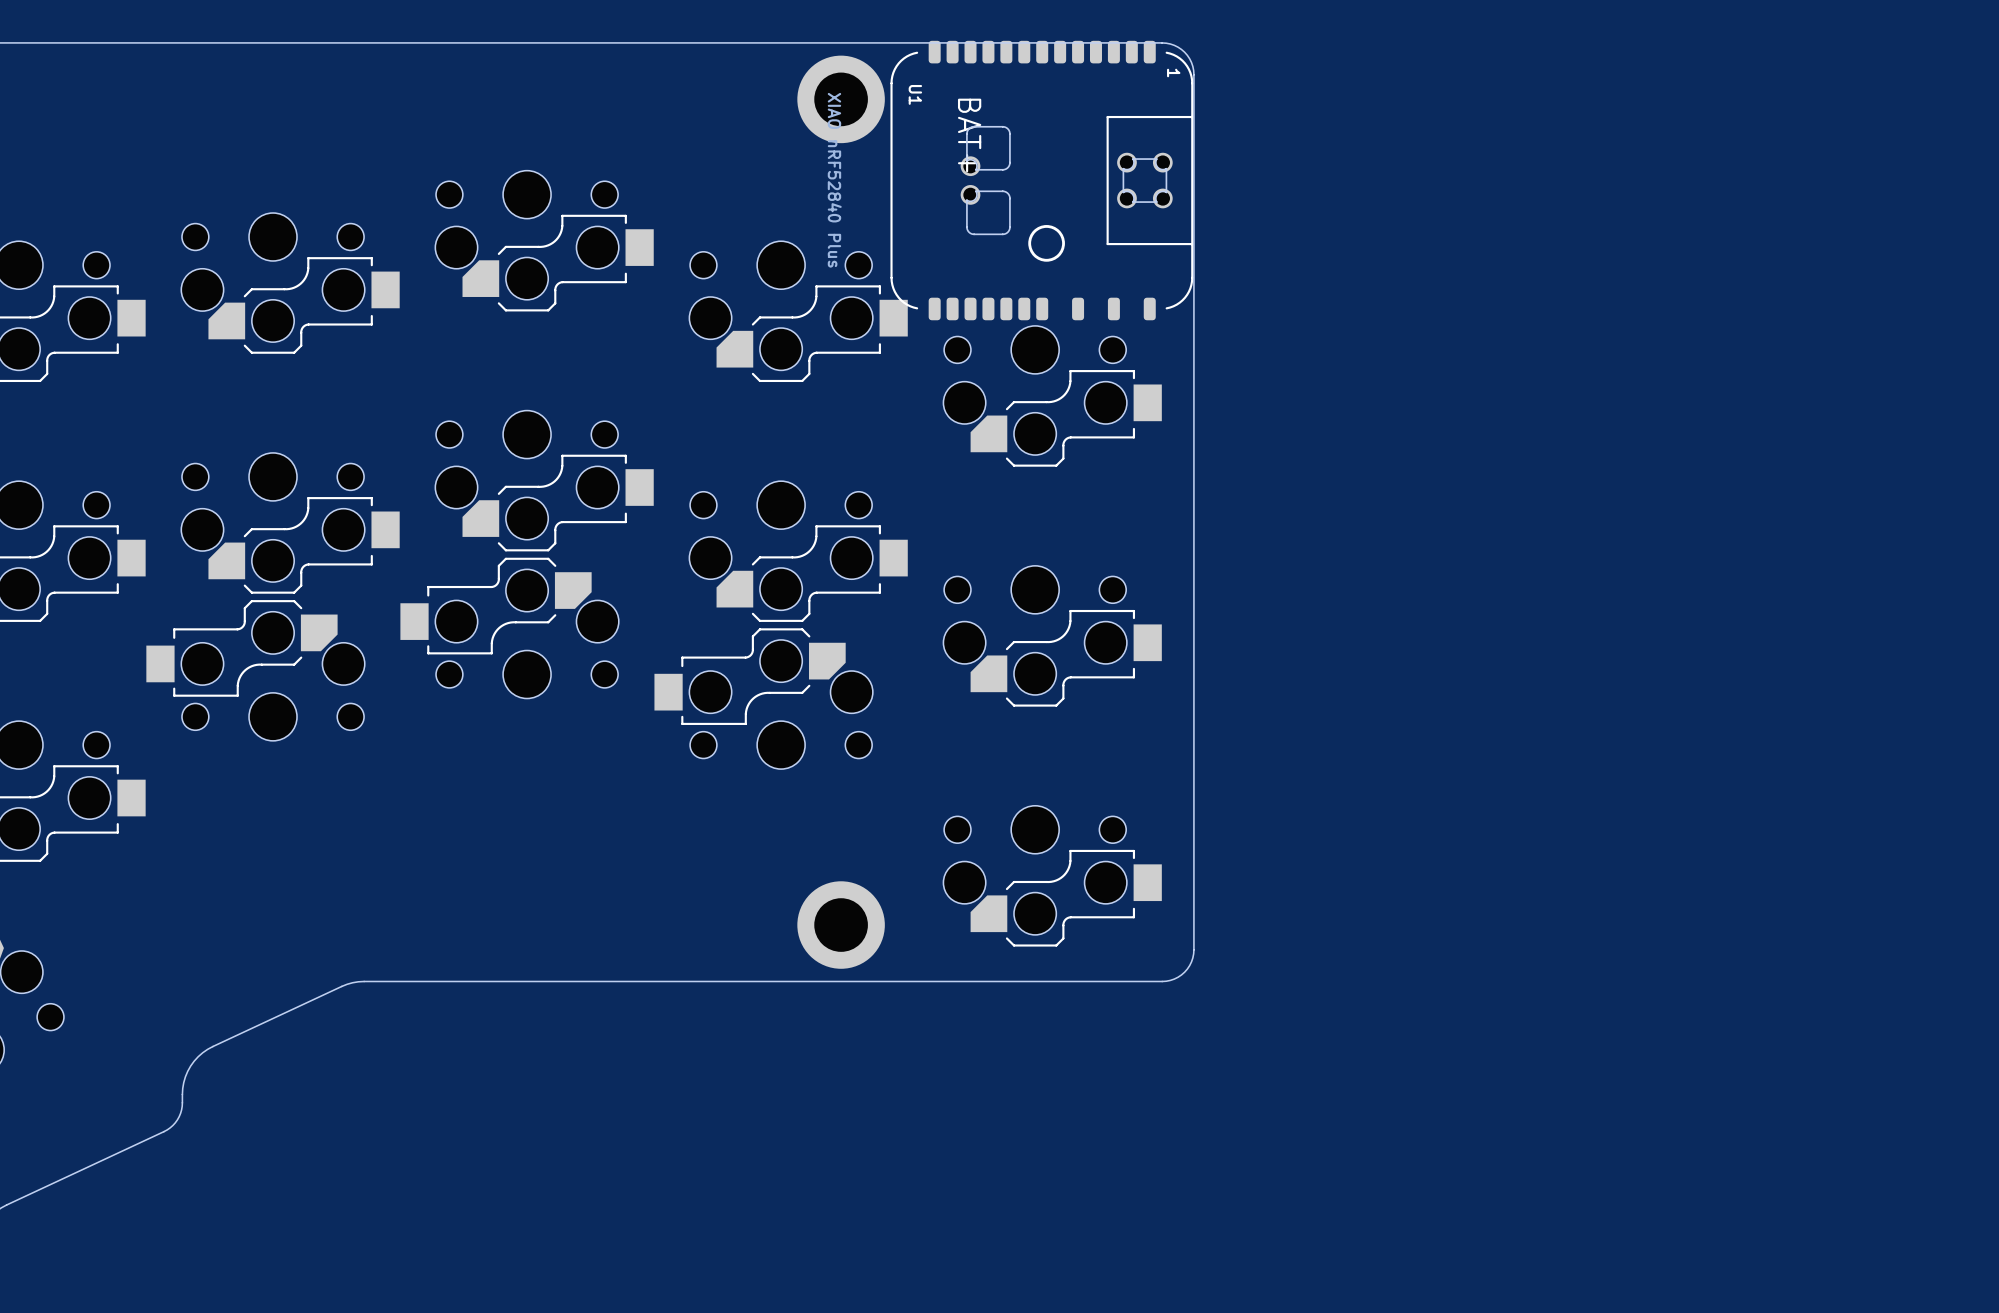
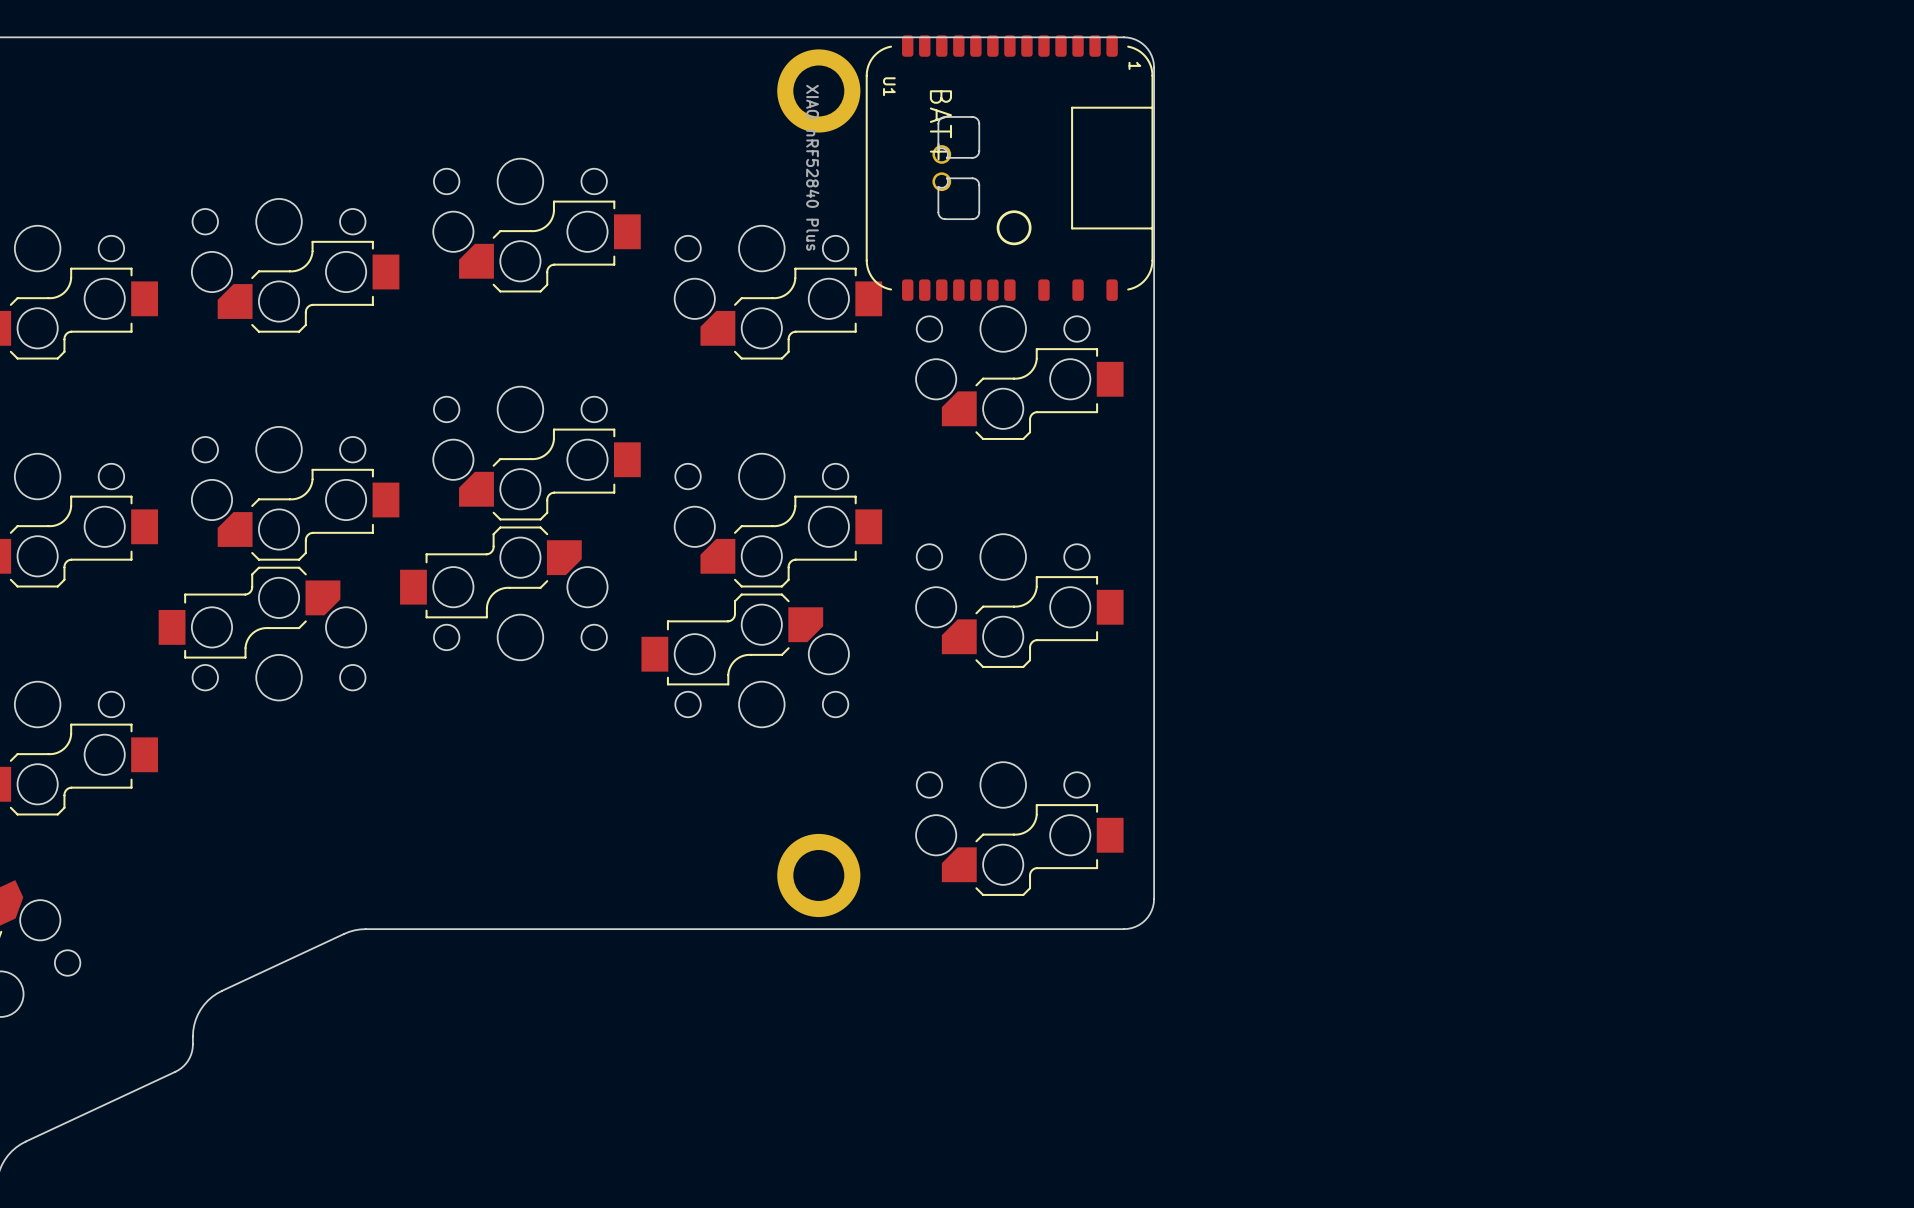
U1 footprint: [890, 40, 1194, 321] -> [865, 35, 1154, 301]

